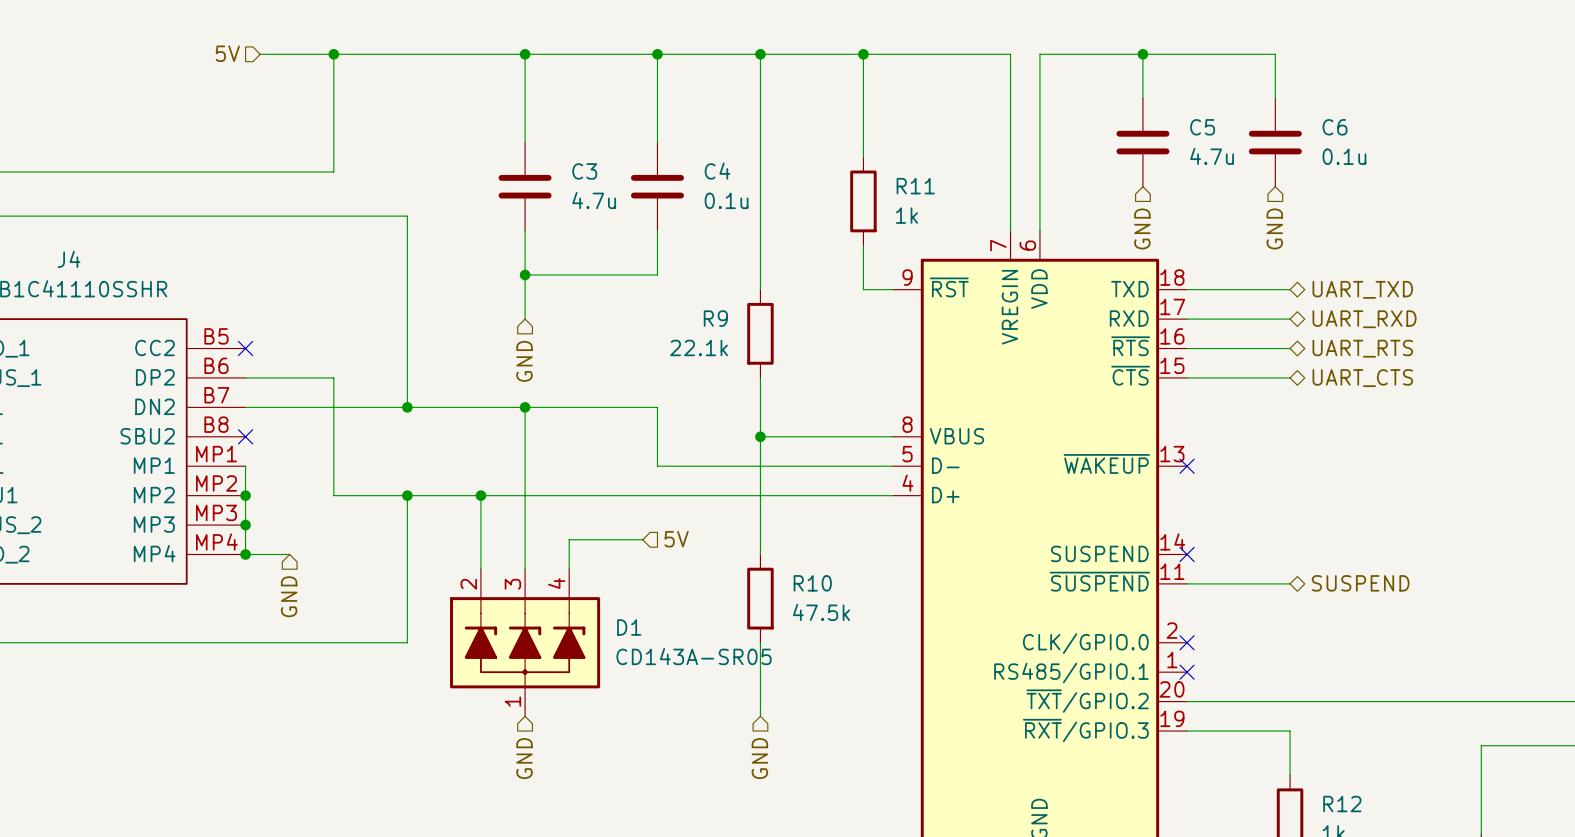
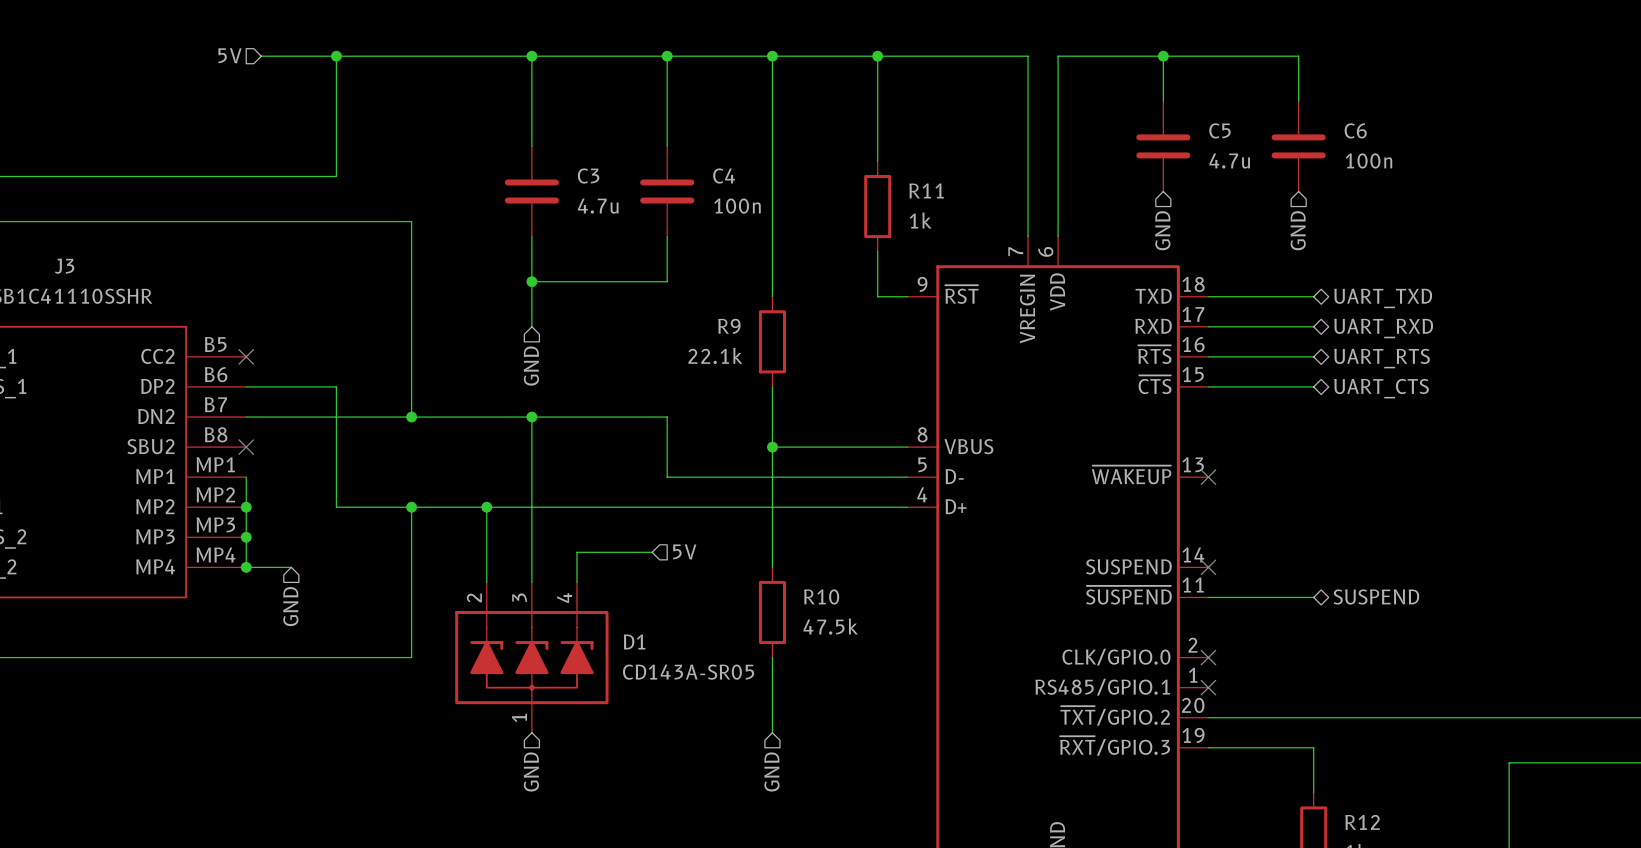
C6 value: 0.1u (1344, 156) -> 100n (1368, 160)
C4 value: 0.1u (726, 200) -> 100n (737, 206)
J4 name: J4 (69, 259) -> J3 (64, 266)

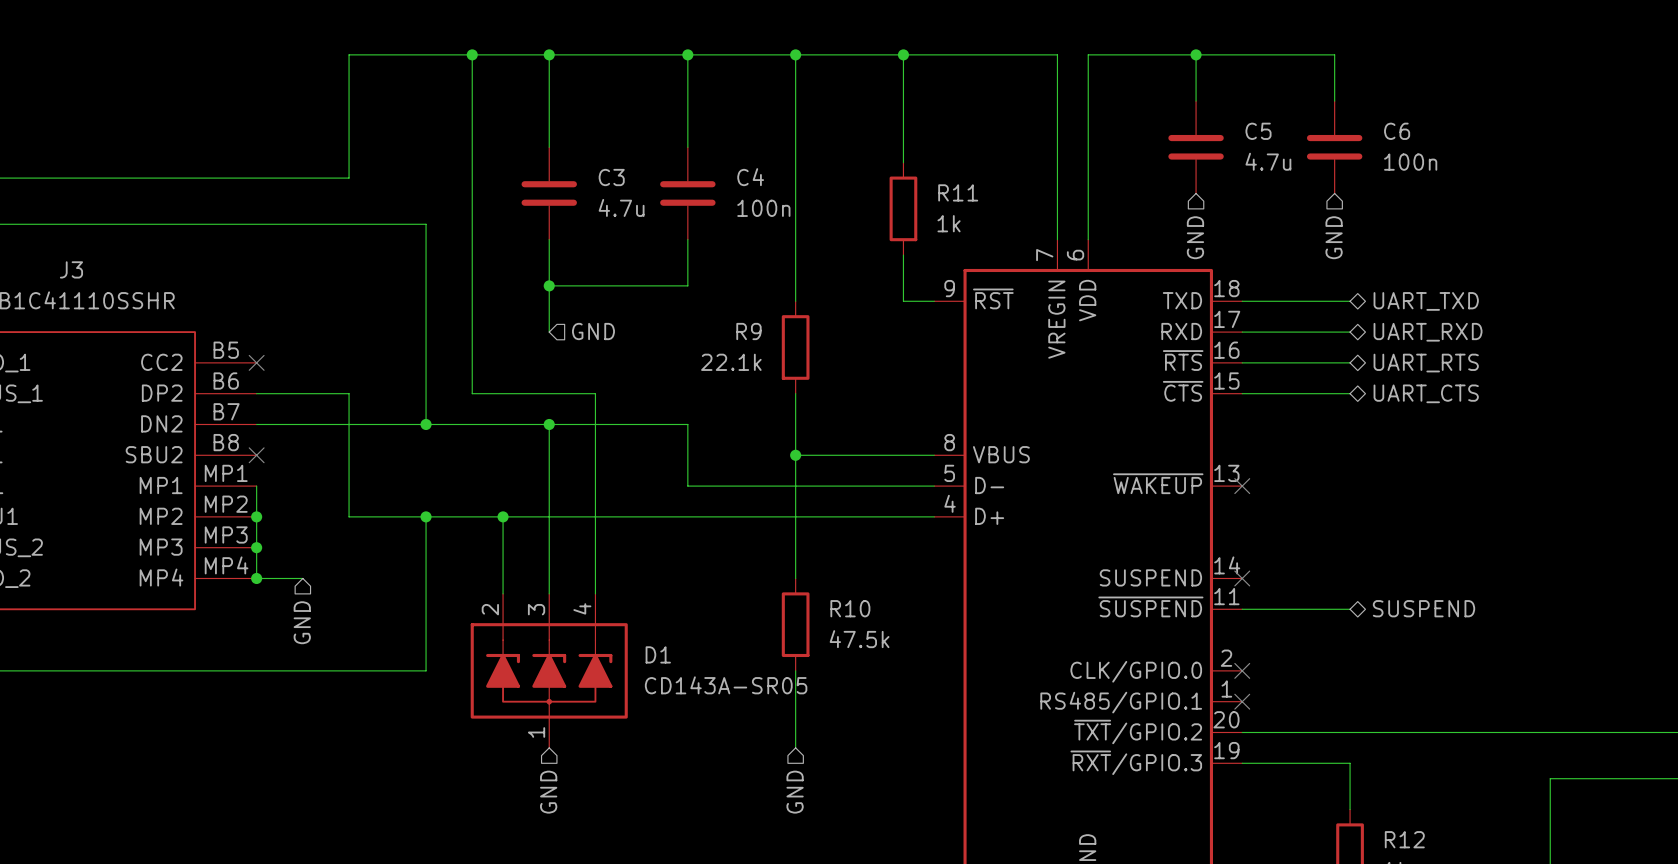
hierarchical label: 5V (229, 55) -> none
wire: (261, 56) (336, 56) -> none
junction: (336, 56) -> none
junction: none -> (472, 54)
hierarchical label rotation: 0° (531, 366) -> 90° counterclockwise (593, 331)
hierarchical label position: GND (531, 366) -> GND (593, 331)
hierarchical label: 5V (684, 551) -> none
wire: (576, 552) (652, 552) -> (595, 563) (595, 393) (472, 393) (472, 54)

